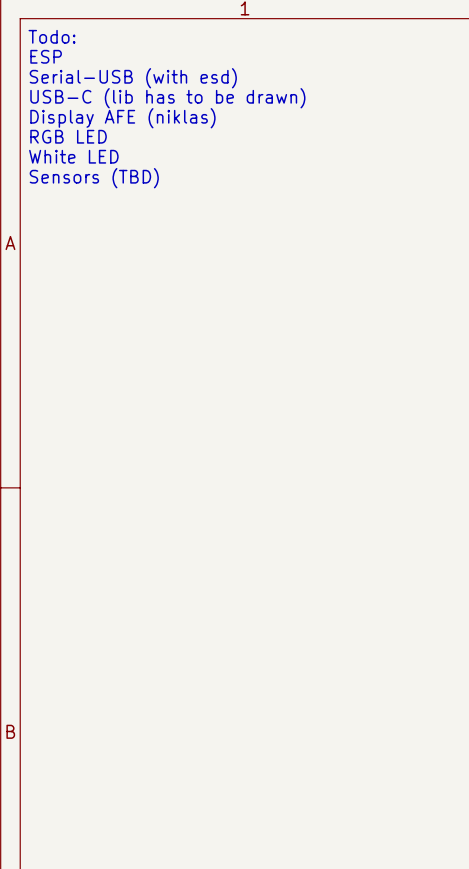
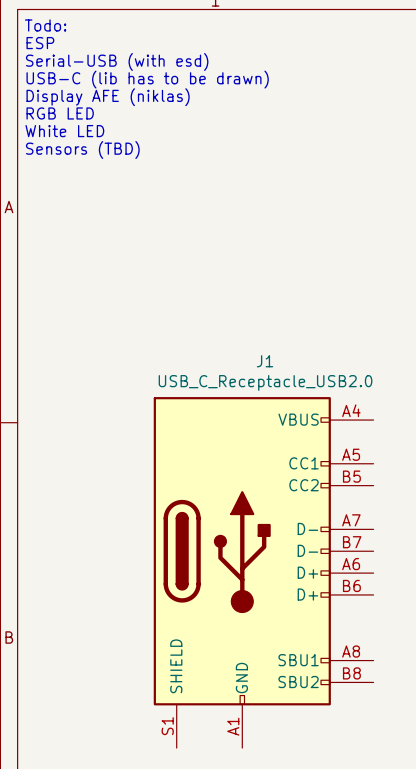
J1: none -> USB_C_Receptacle_USB2.0 (263, 572)

